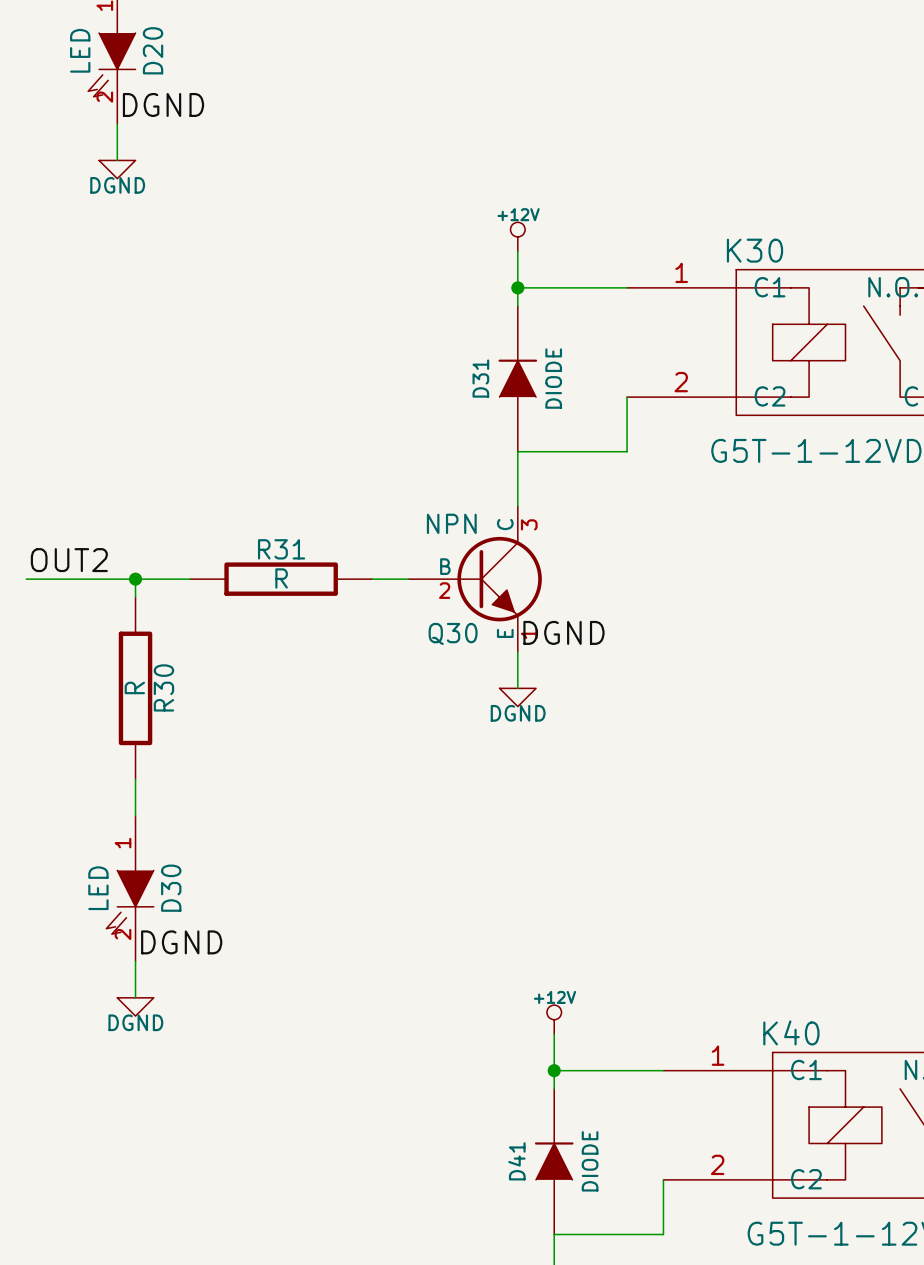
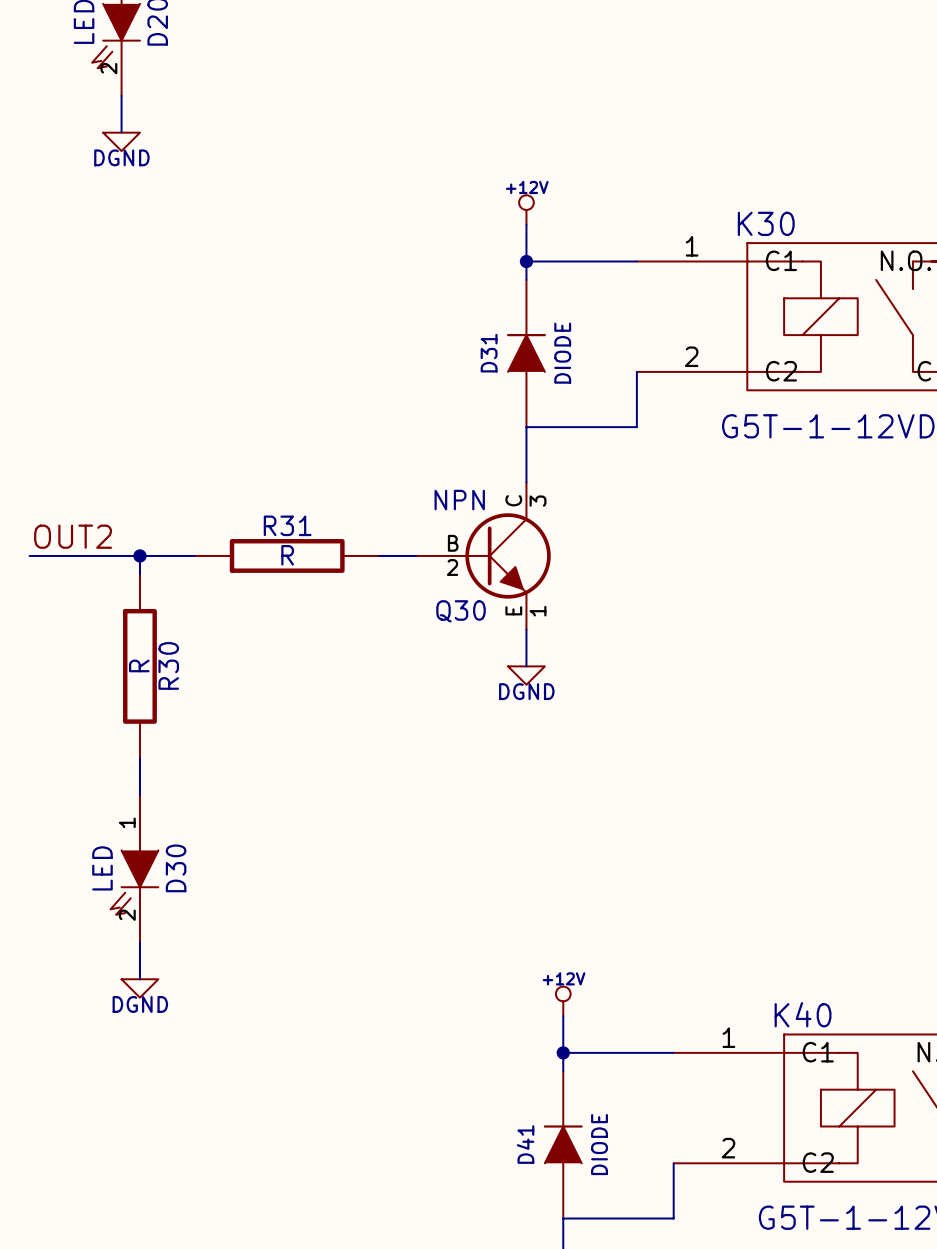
label: DGND (163, 104) -> none
label: DGND (563, 632) -> none
label: DGND (181, 942) -> none

